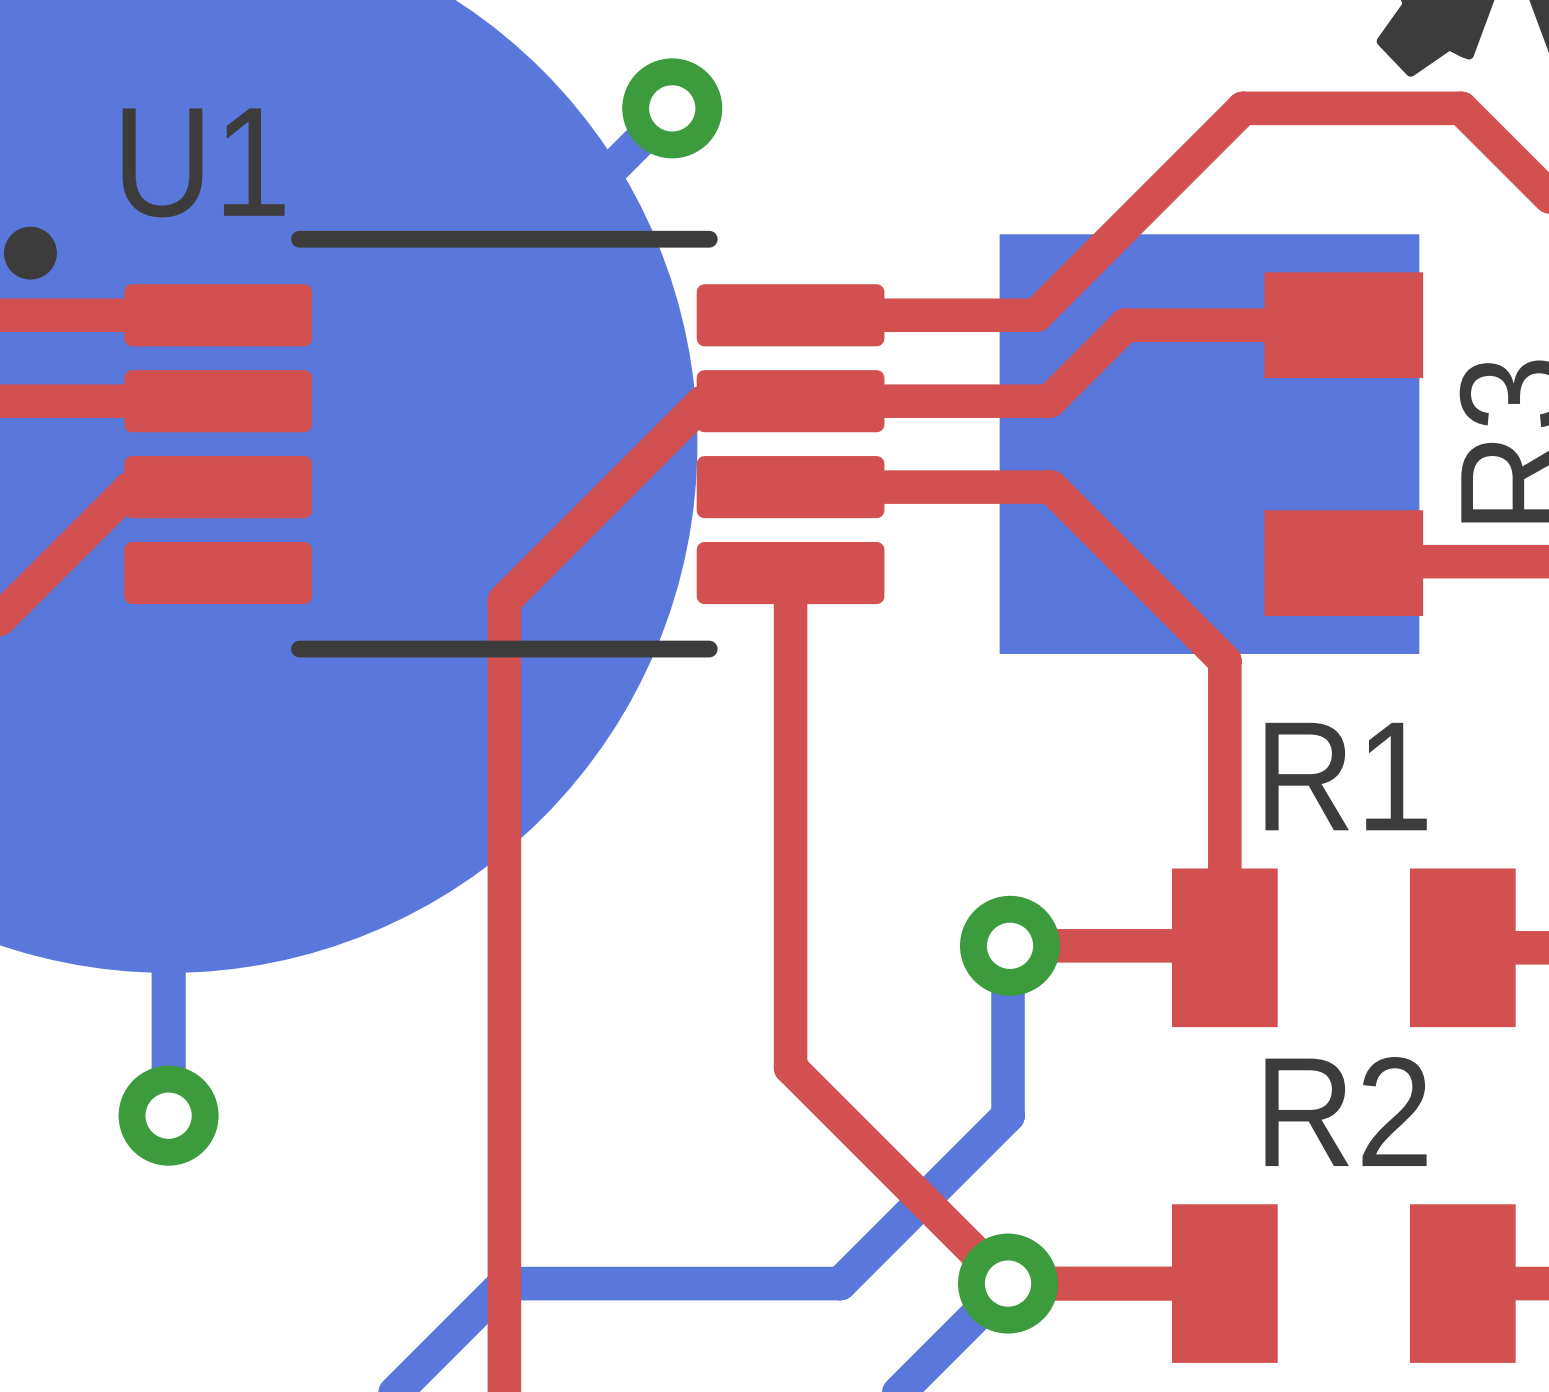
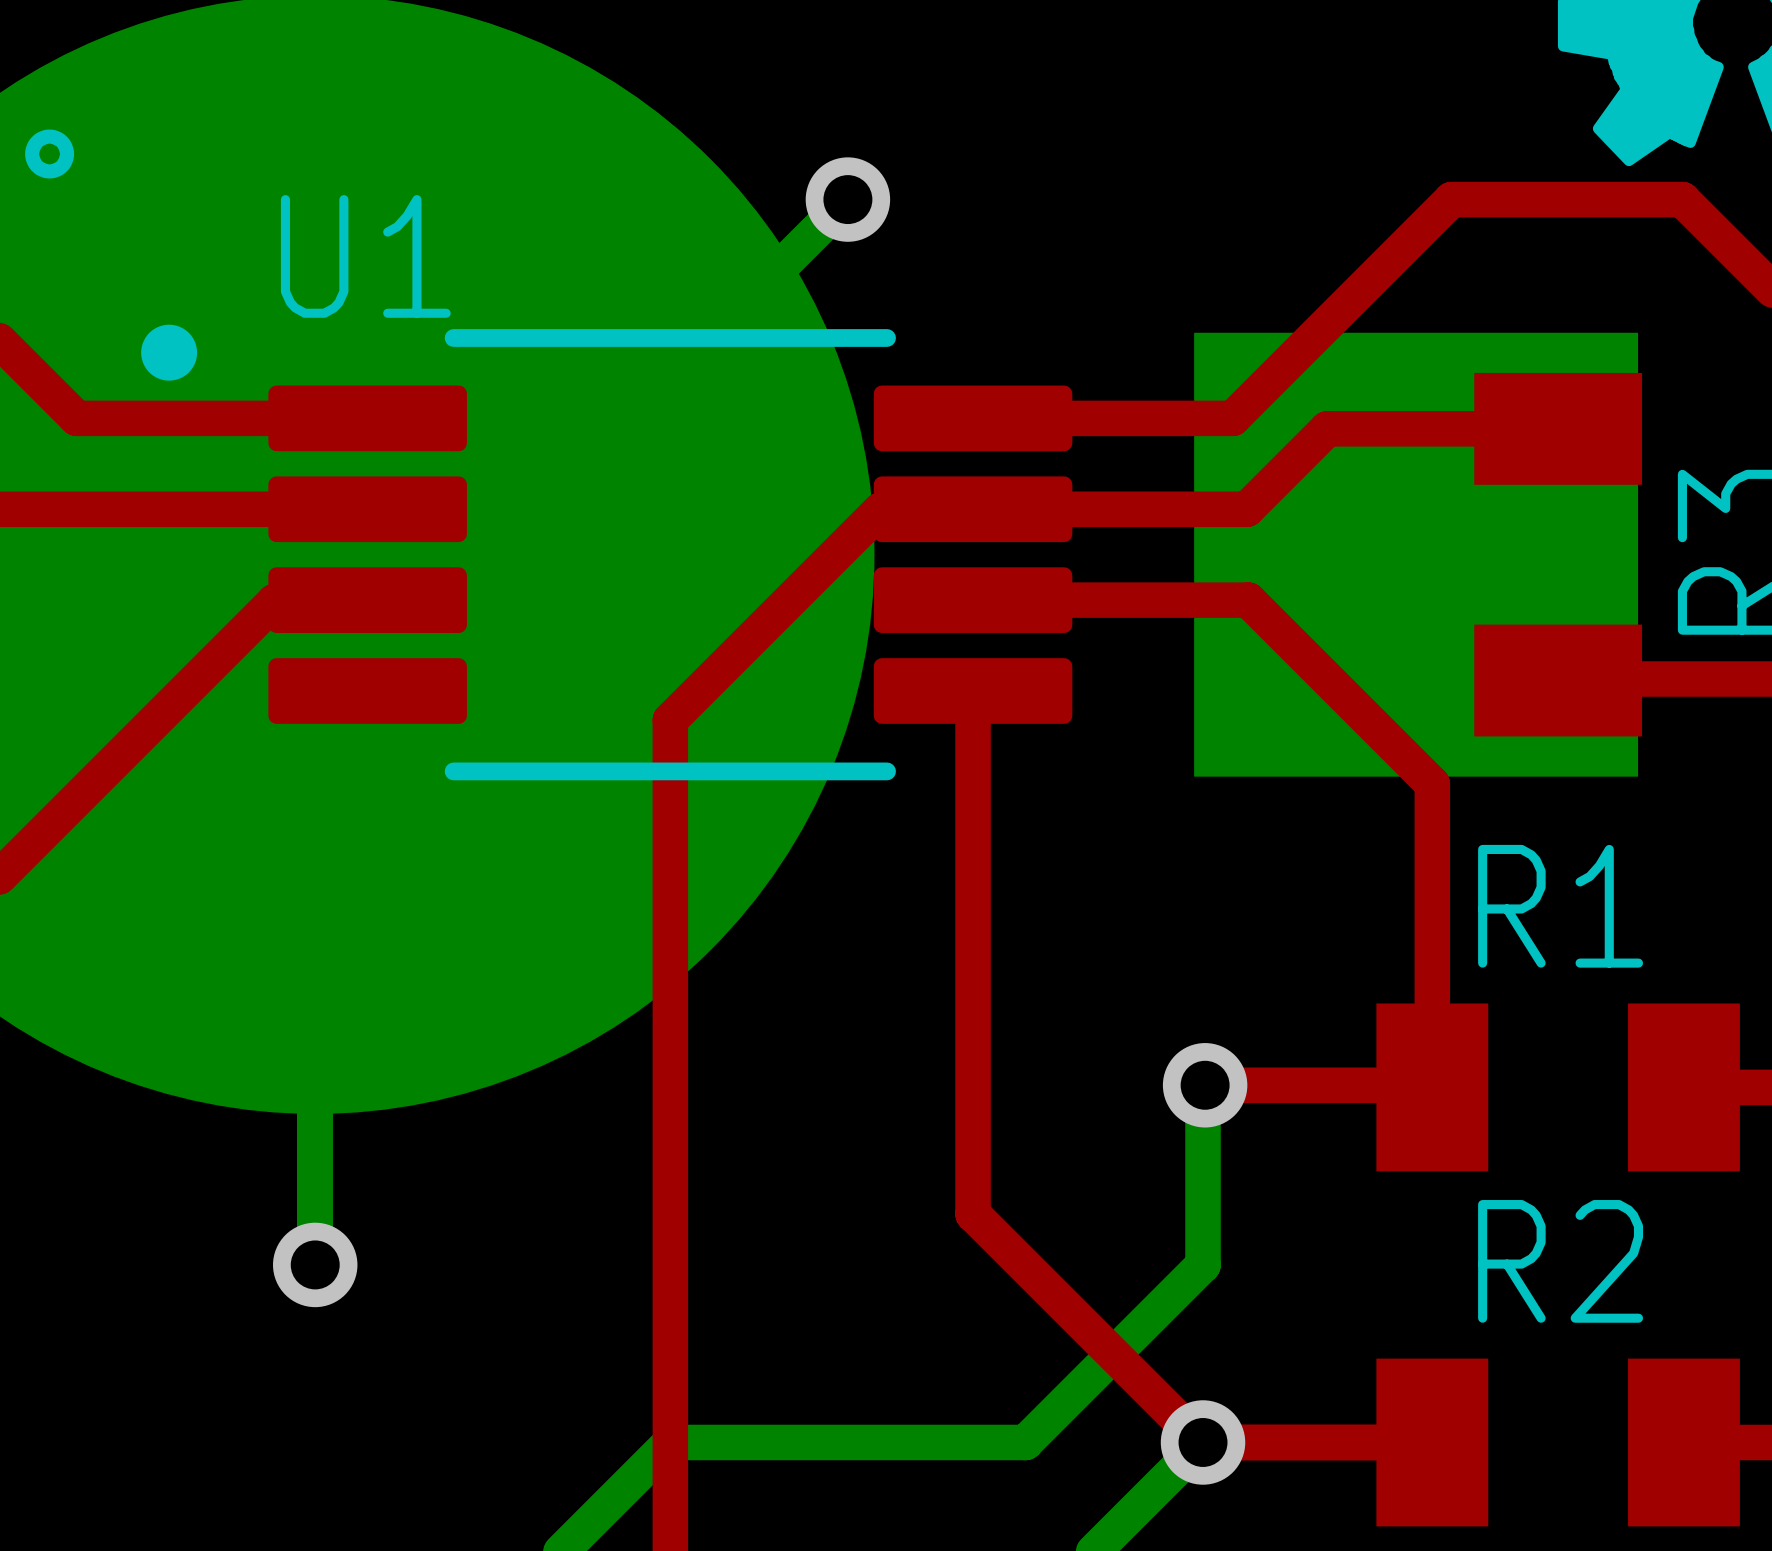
via size: [622, 58, 723, 159] -> [805, 157, 891, 242]
via size: [960, 895, 1061, 996] -> [1162, 1043, 1248, 1128]
via size: [118, 1065, 219, 1166] -> [273, 1222, 358, 1308]
via size: [958, 1233, 1059, 1334] -> [1160, 1400, 1246, 1485]

